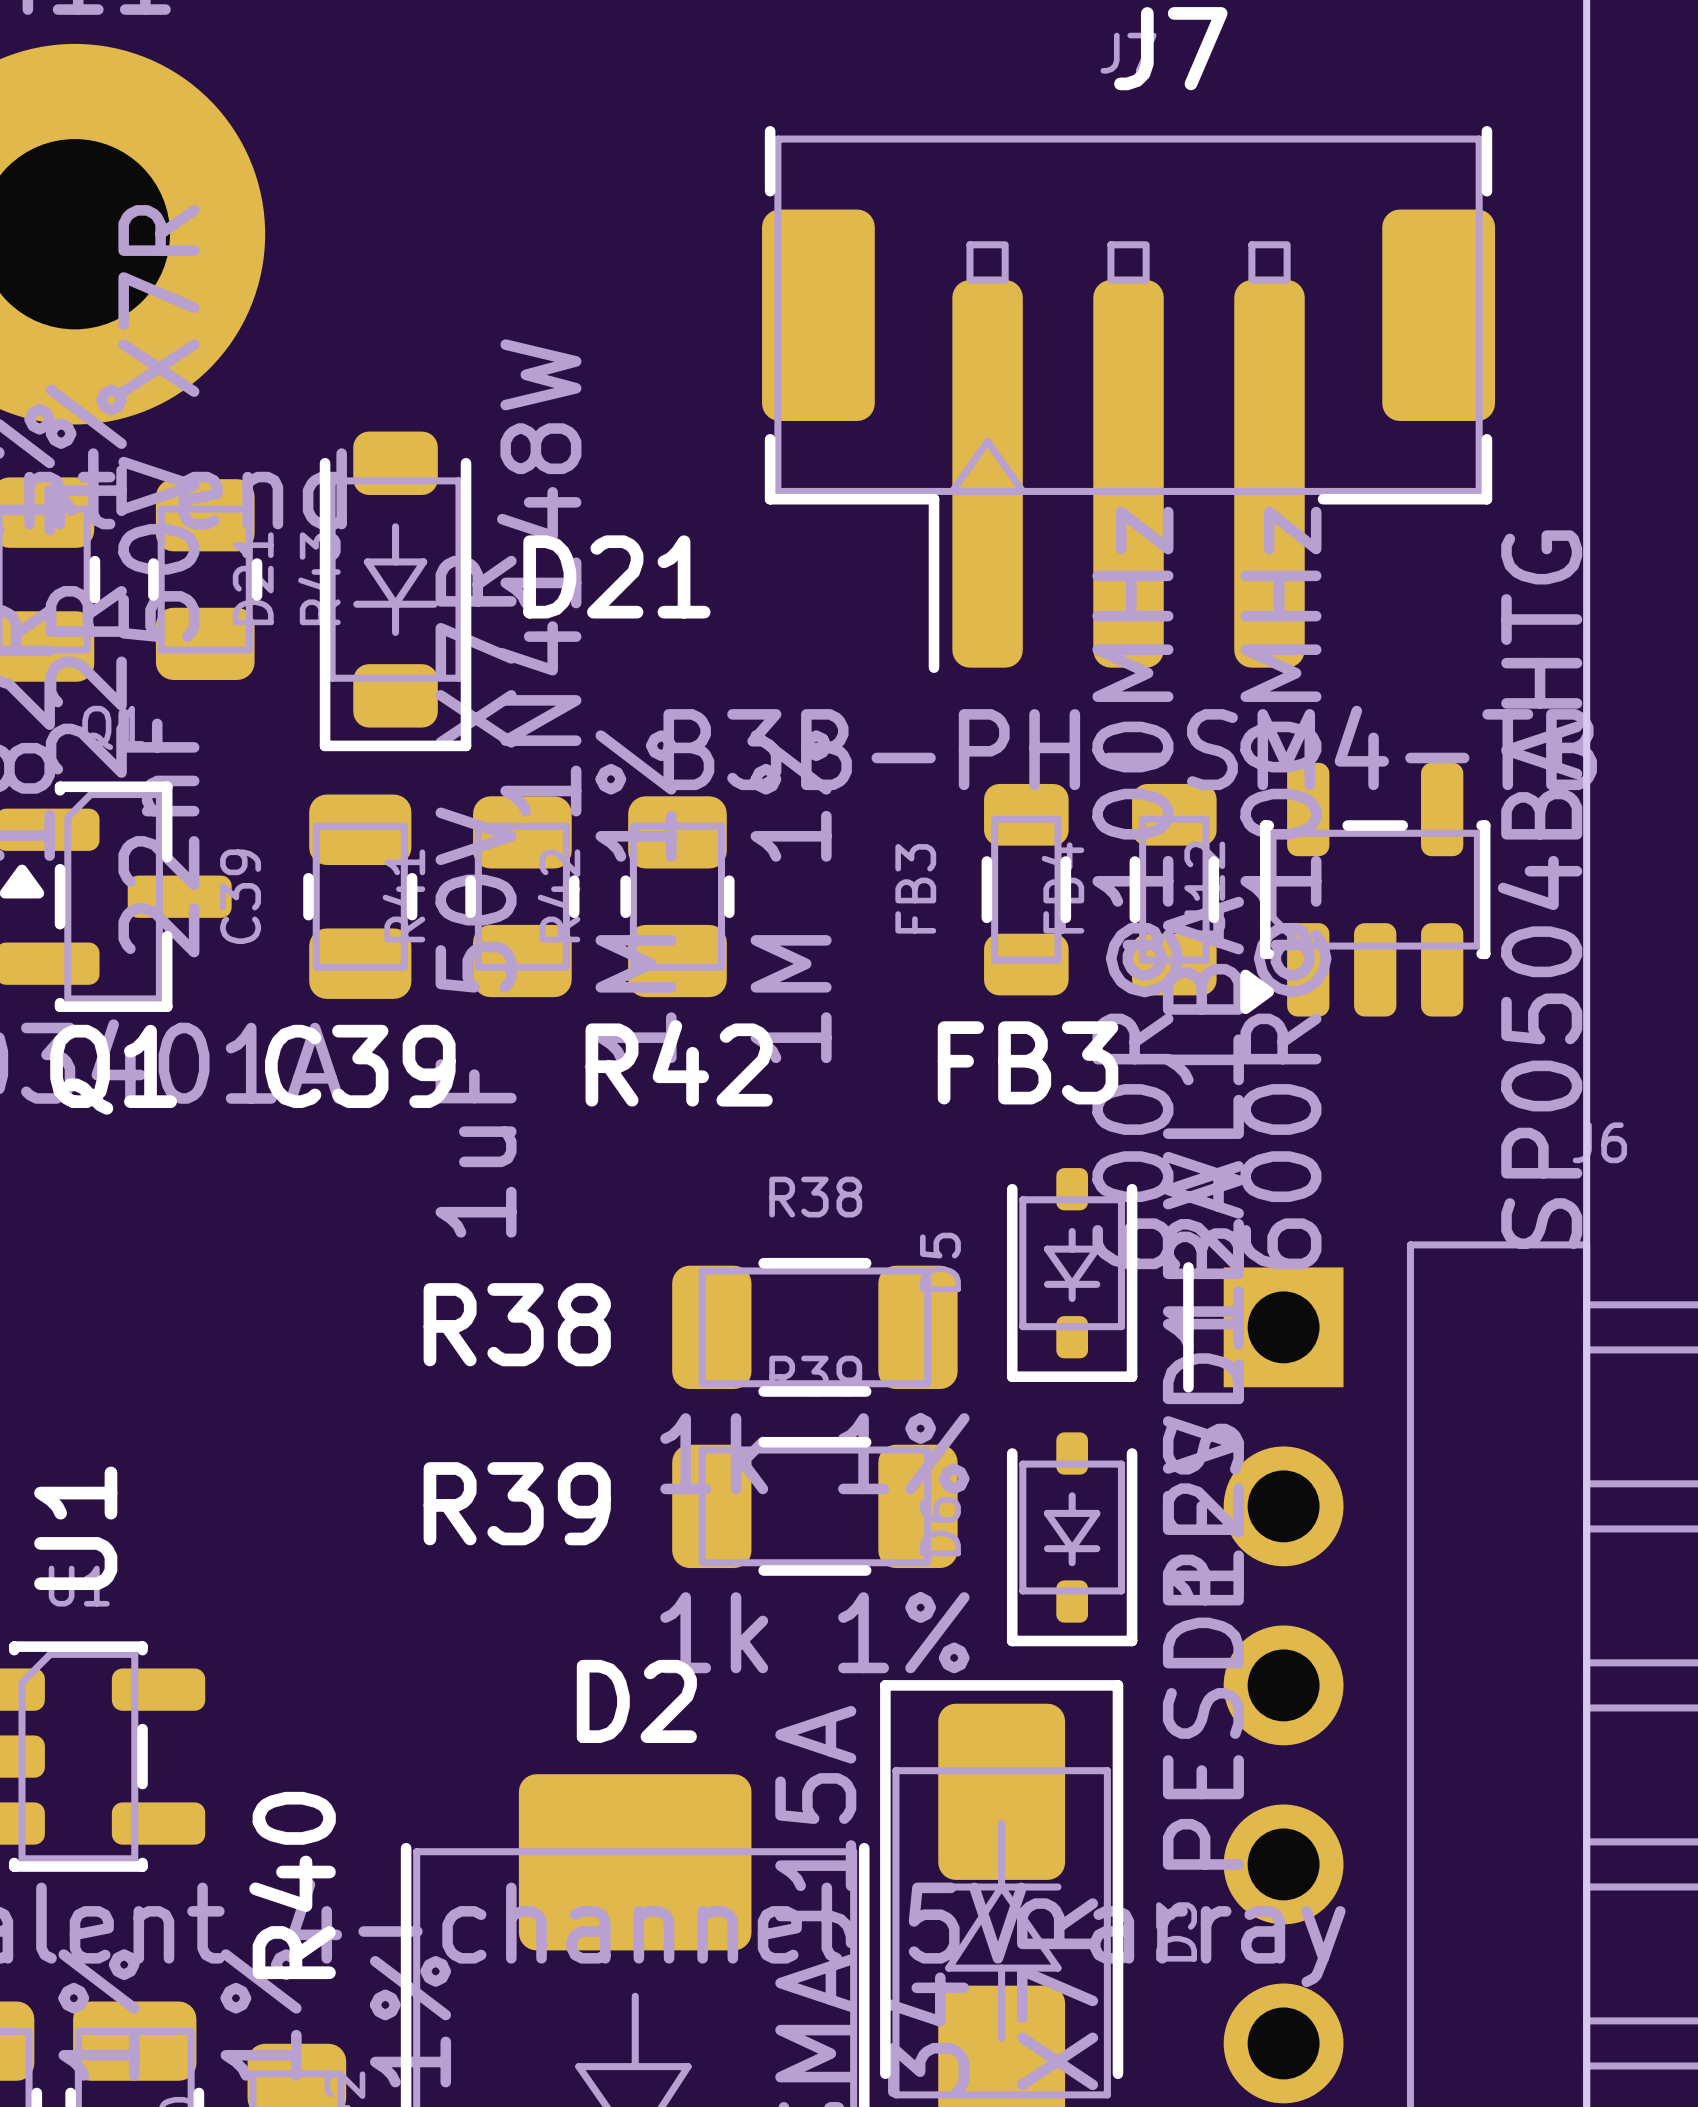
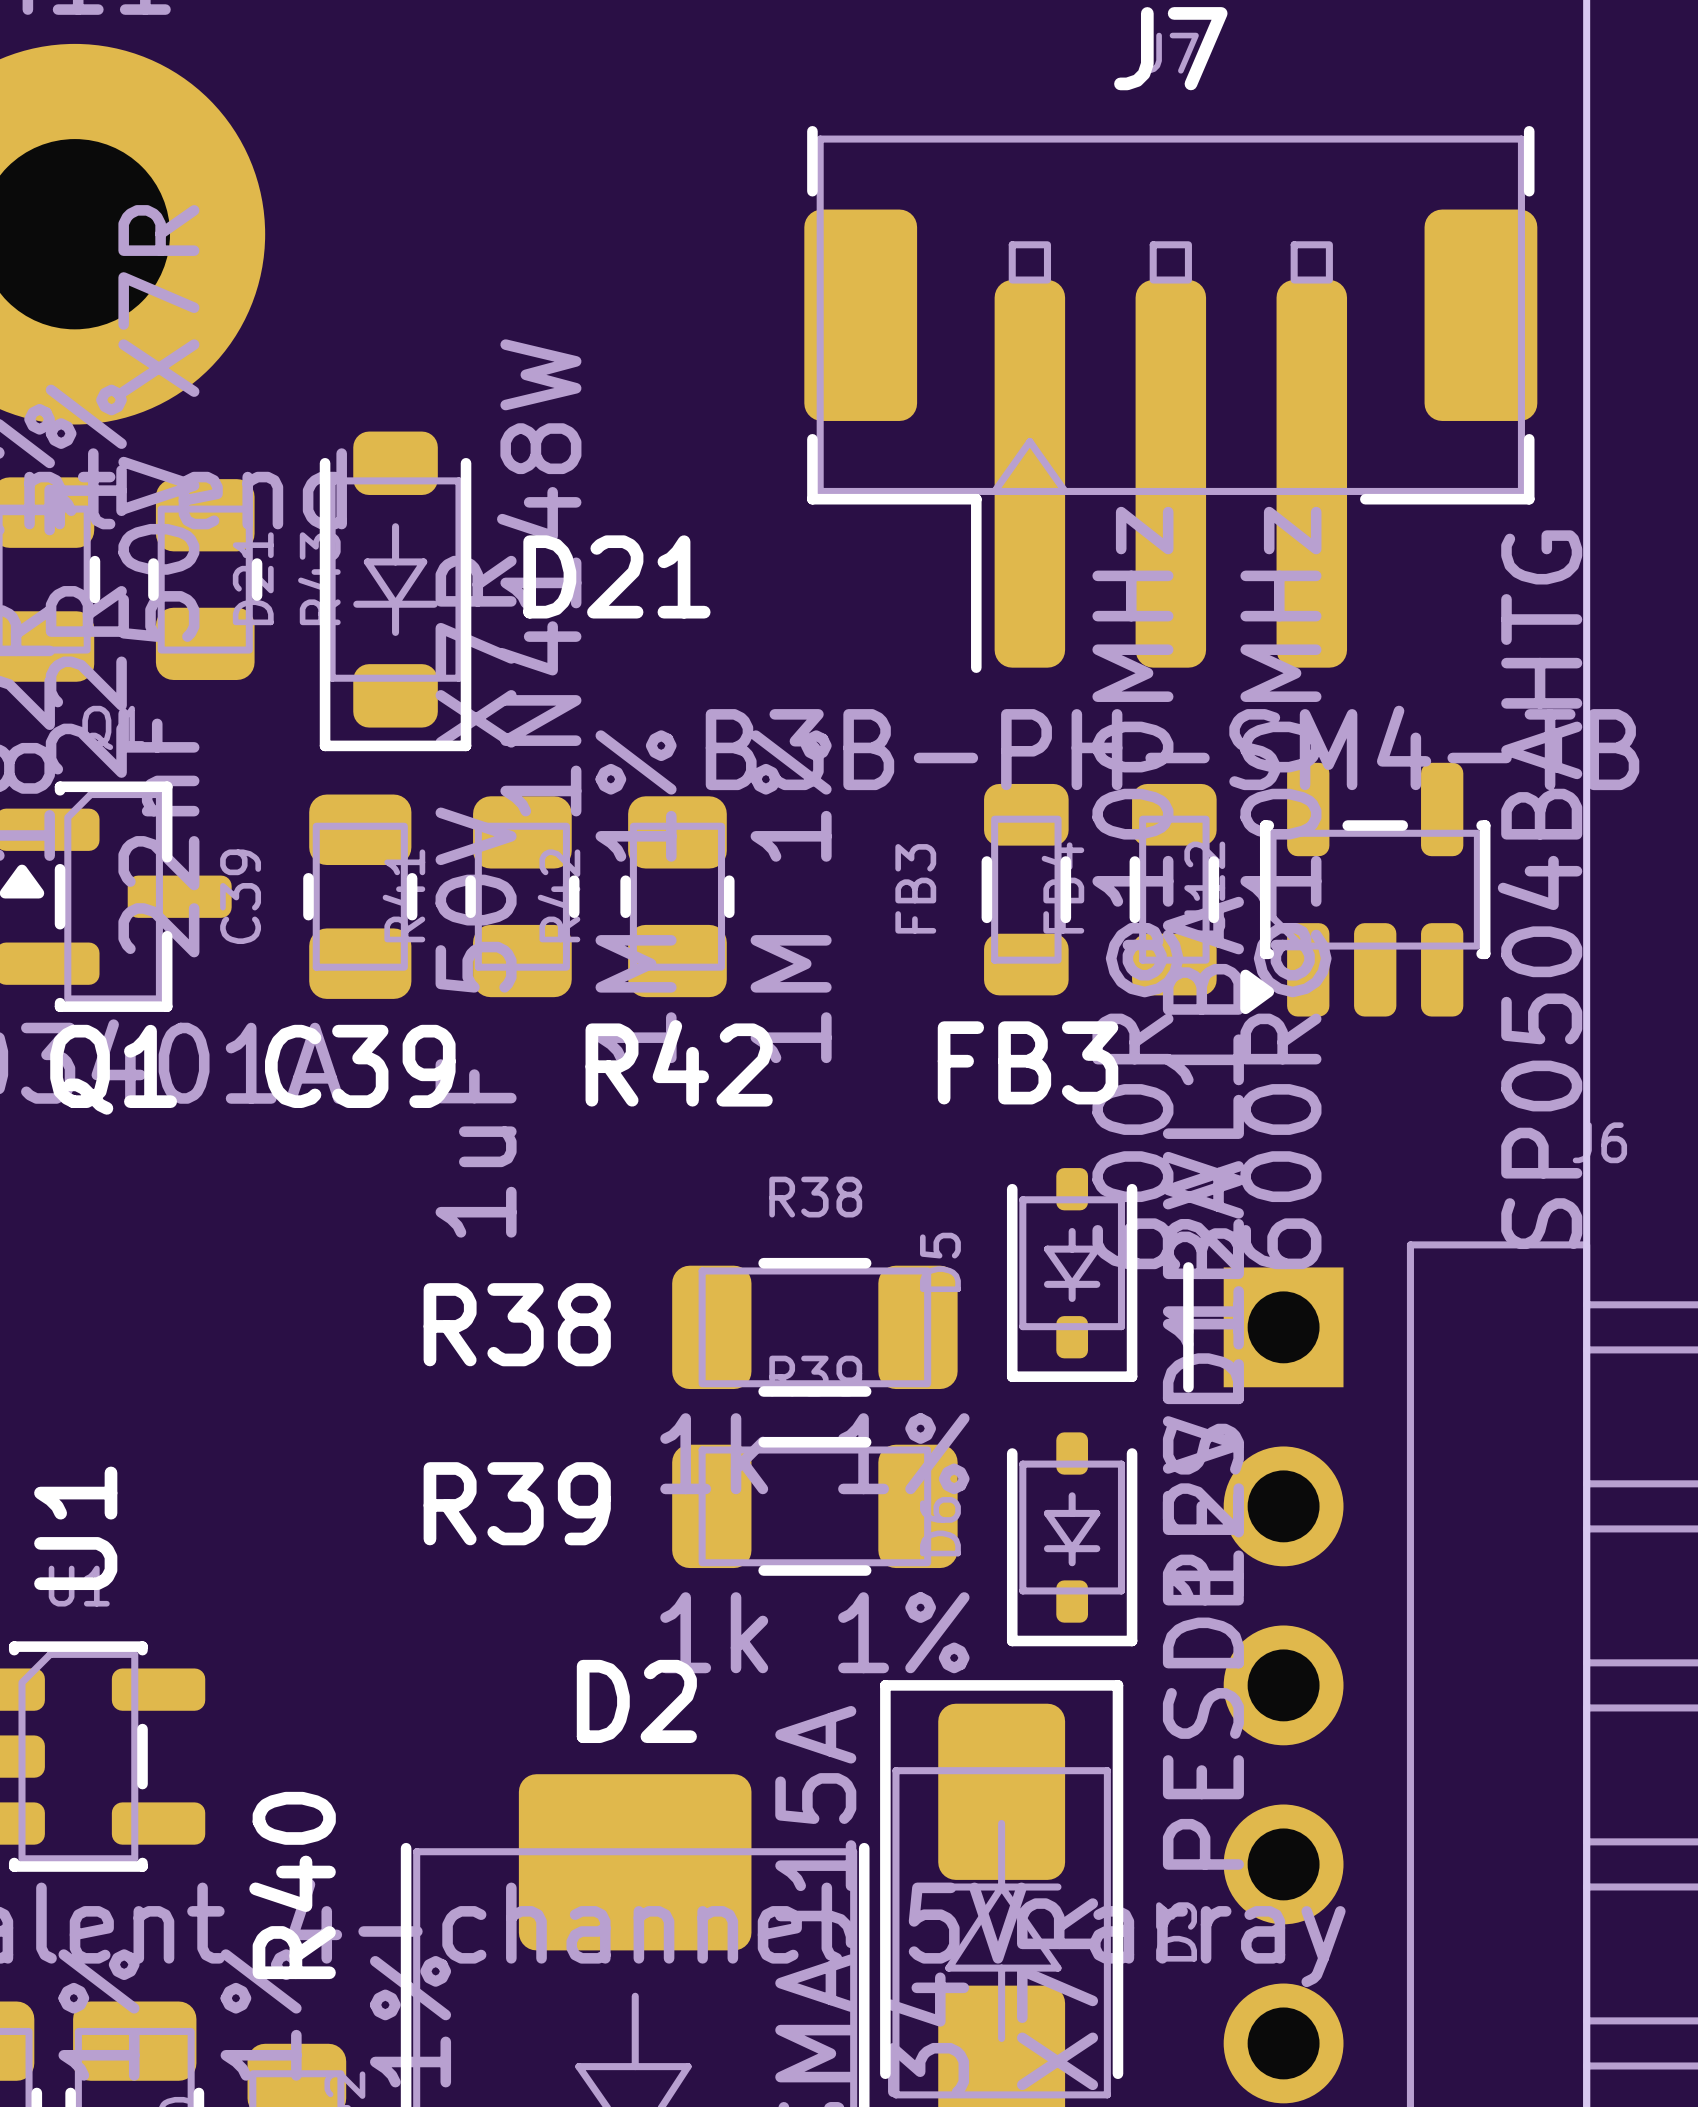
J7 position: (1128, 399) -> (1170, 399)

